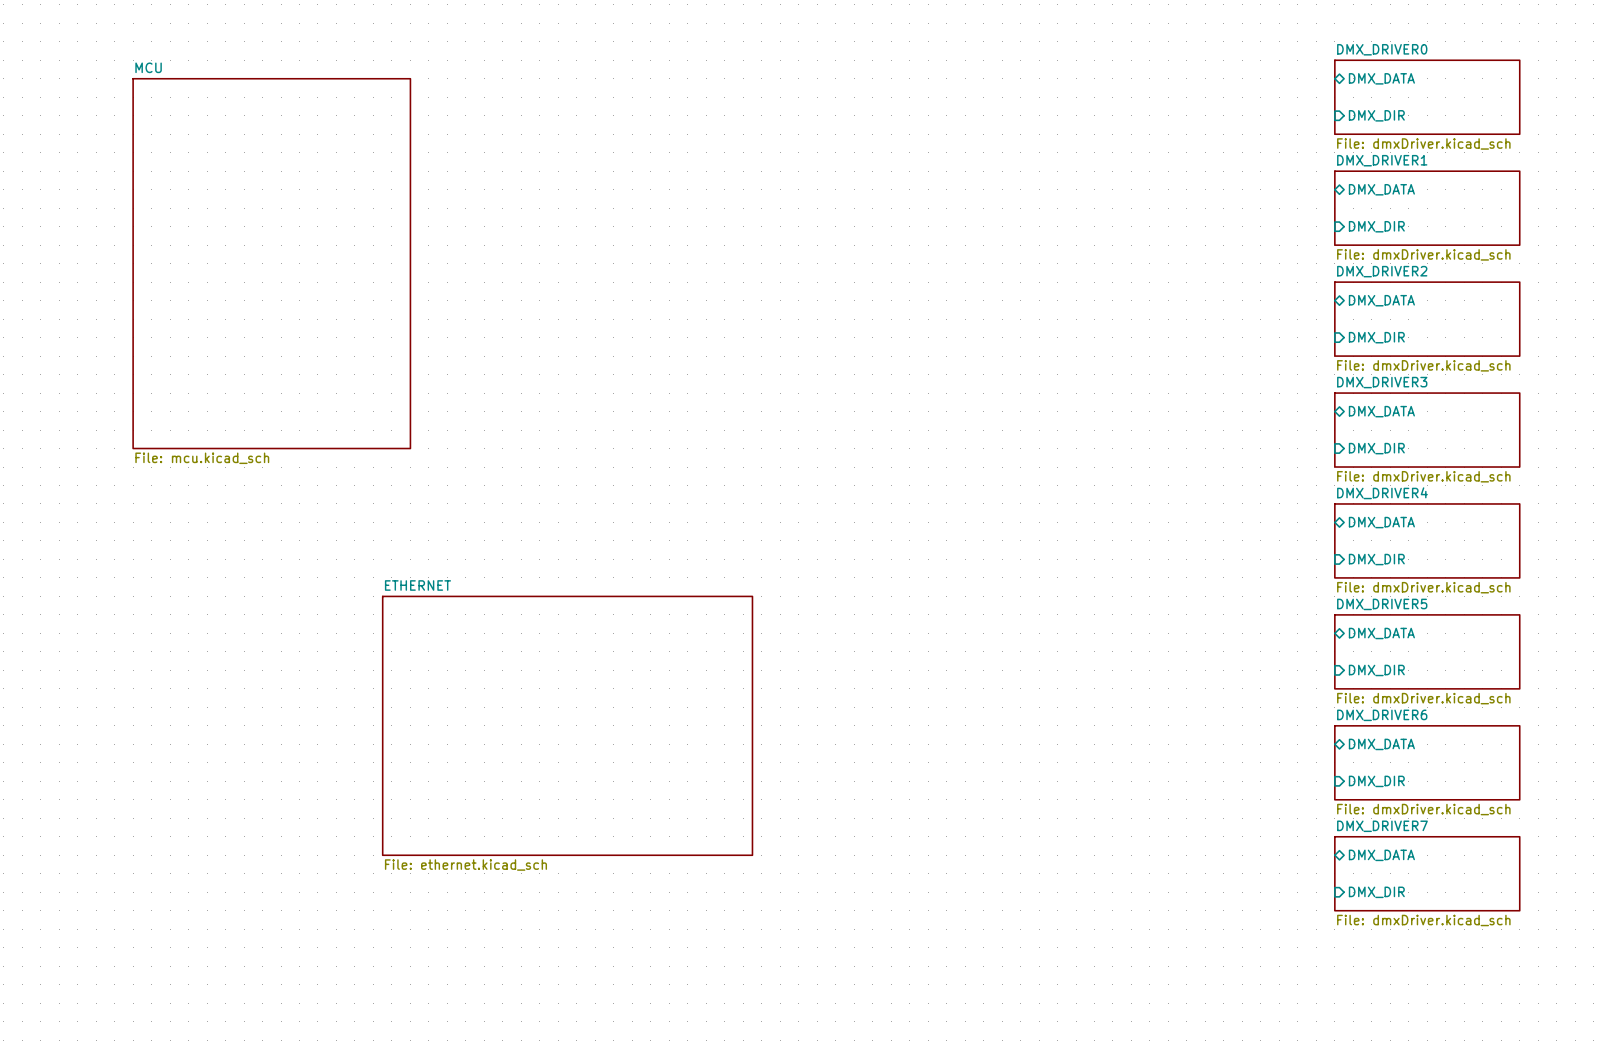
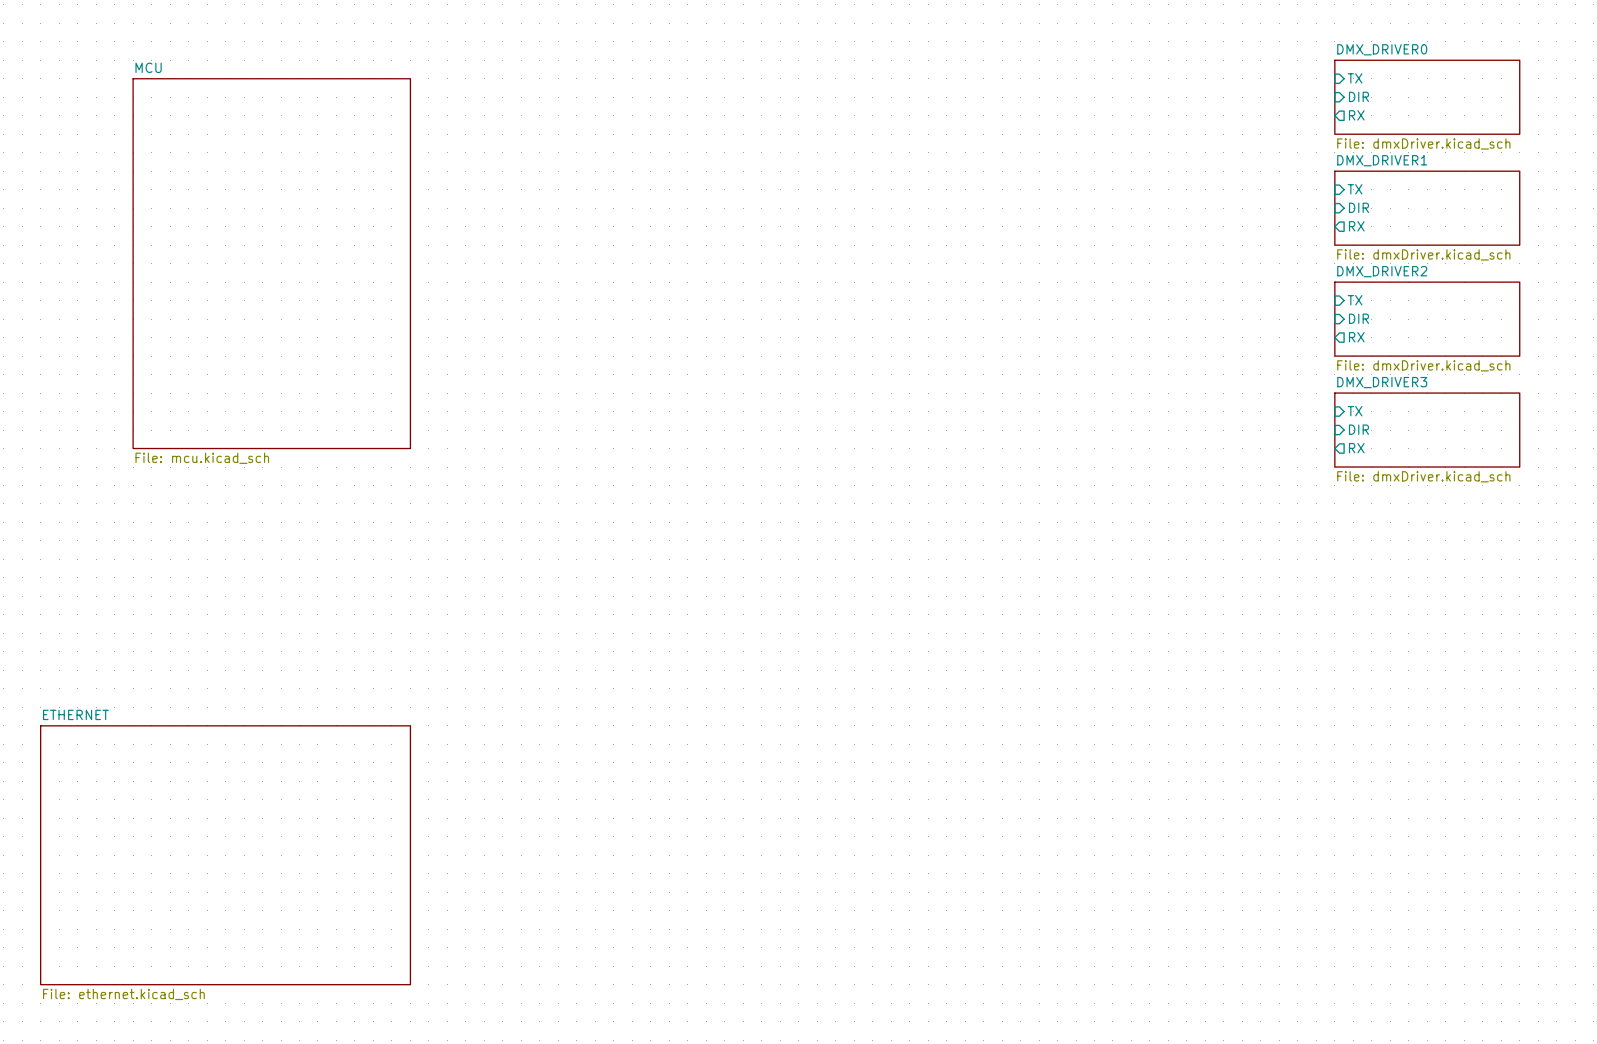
sheet pin shape: bidirectional (1381, 78) -> input (1355, 78)
sheet pin: DMX_DATA (1381, 78) -> TX (1355, 78)
sheet pin: none -> DIR (1358, 96)
sheet pin shape: input (1376, 115) -> output (1356, 115)
sheet pin: DMX_DIR (1376, 115) -> RX (1356, 115)
sheet pin shape: bidirectional (1381, 189) -> input (1355, 189)
sheet pin: DMX_DATA (1381, 189) -> TX (1355, 189)
sheet pin: none -> DIR (1358, 207)
sheet pin shape: input (1376, 226) -> output (1356, 226)
sheet pin: DMX_DIR (1376, 226) -> RX (1356, 226)
sheet pin shape: bidirectional (1381, 300) -> input (1355, 300)
sheet pin: DMX_DATA (1381, 300) -> TX (1355, 300)
sheet pin: none -> DIR (1358, 318)
sheet pin shape: input (1376, 337) -> output (1356, 337)
sheet pin: DMX_DIR (1376, 337) -> RX (1356, 337)
sheet pin shape: bidirectional (1381, 411) -> input (1355, 411)
sheet pin: DMX_DATA (1381, 411) -> TX (1355, 411)
sheet pin: none -> DIR (1358, 429)
sheet pin shape: input (1376, 448) -> output (1356, 448)
sheet pin: DMX_DIR (1376, 448) -> RX (1356, 448)
sheet pin: DMX_DATA (1381, 522) -> none
sheet DMX_DRIVER4: File: dmxDriver.kicad_sch (1427, 540) -> none
sheet pin: DMX_DIR (1376, 559) -> none
sheet pin: DMX_DATA (1381, 633) -> none
sheet DMX_DRIVER5: File: dmxDriver.kicad_sch (1427, 651) -> none
sheet pin: DMX_DIR (1376, 670) -> none
sheet ETHERNET: File: ethernet.kicad_sch (567, 725) -> none
sheet pin: DMX_DATA (1381, 744) -> none
sheet DMX_DRIVER6: File: dmxDriver.kicad_sch (1427, 762) -> none
sheet pin: DMX_DIR (1376, 781) -> none
sheet ETHERNET: none -> File: ethernet.kicad_sch (225, 855)
sheet pin: DMX_DATA (1381, 855) -> none
sheet DMX_DRIVER7: File: dmxDriver.kicad_sch (1427, 873) -> none
sheet pin: DMX_DIR (1376, 892) -> none

